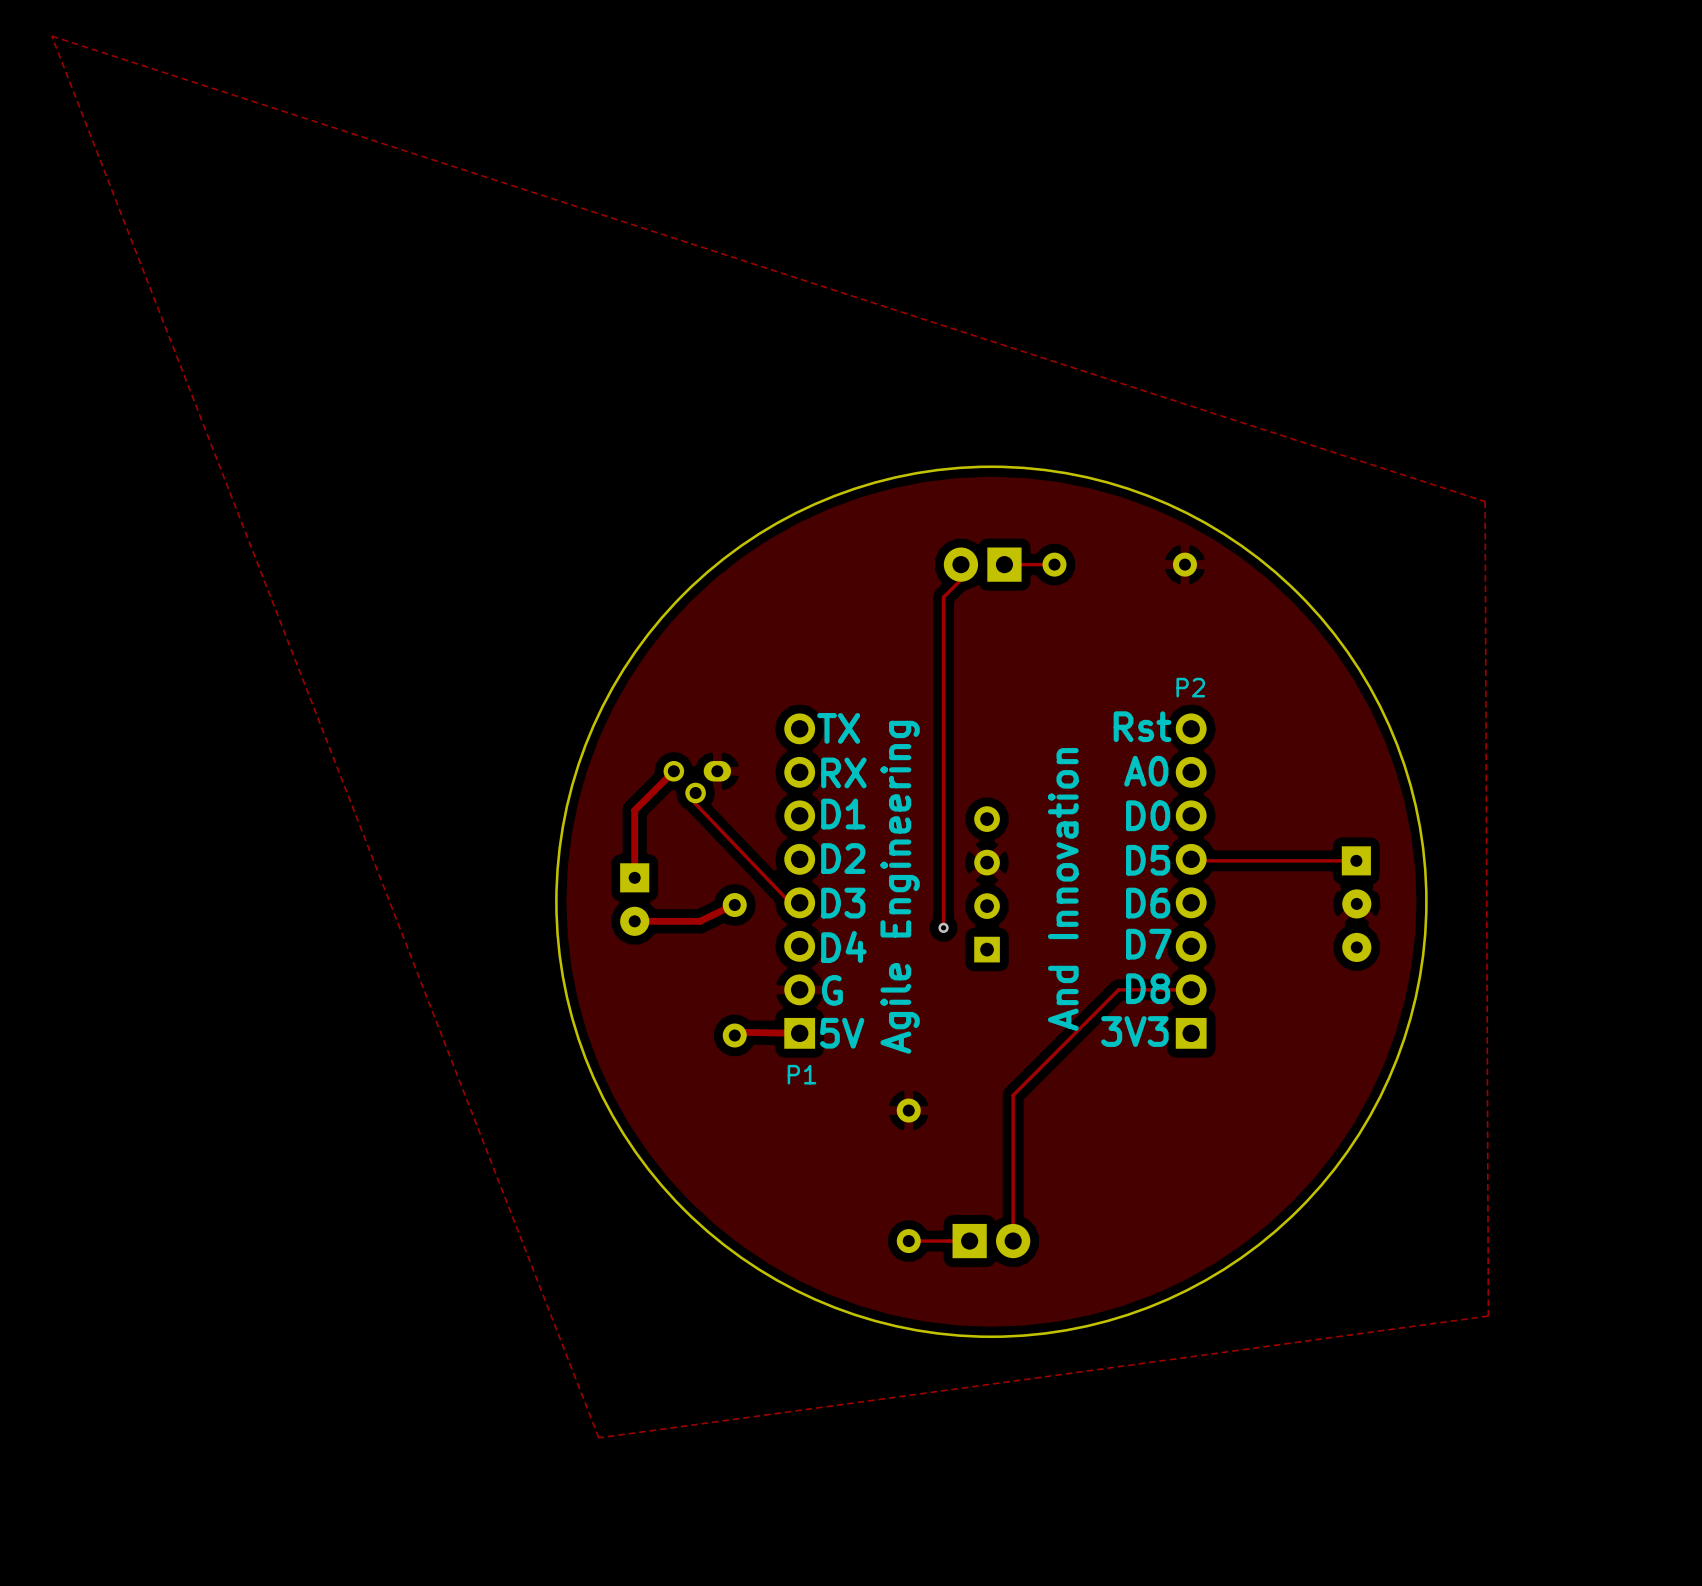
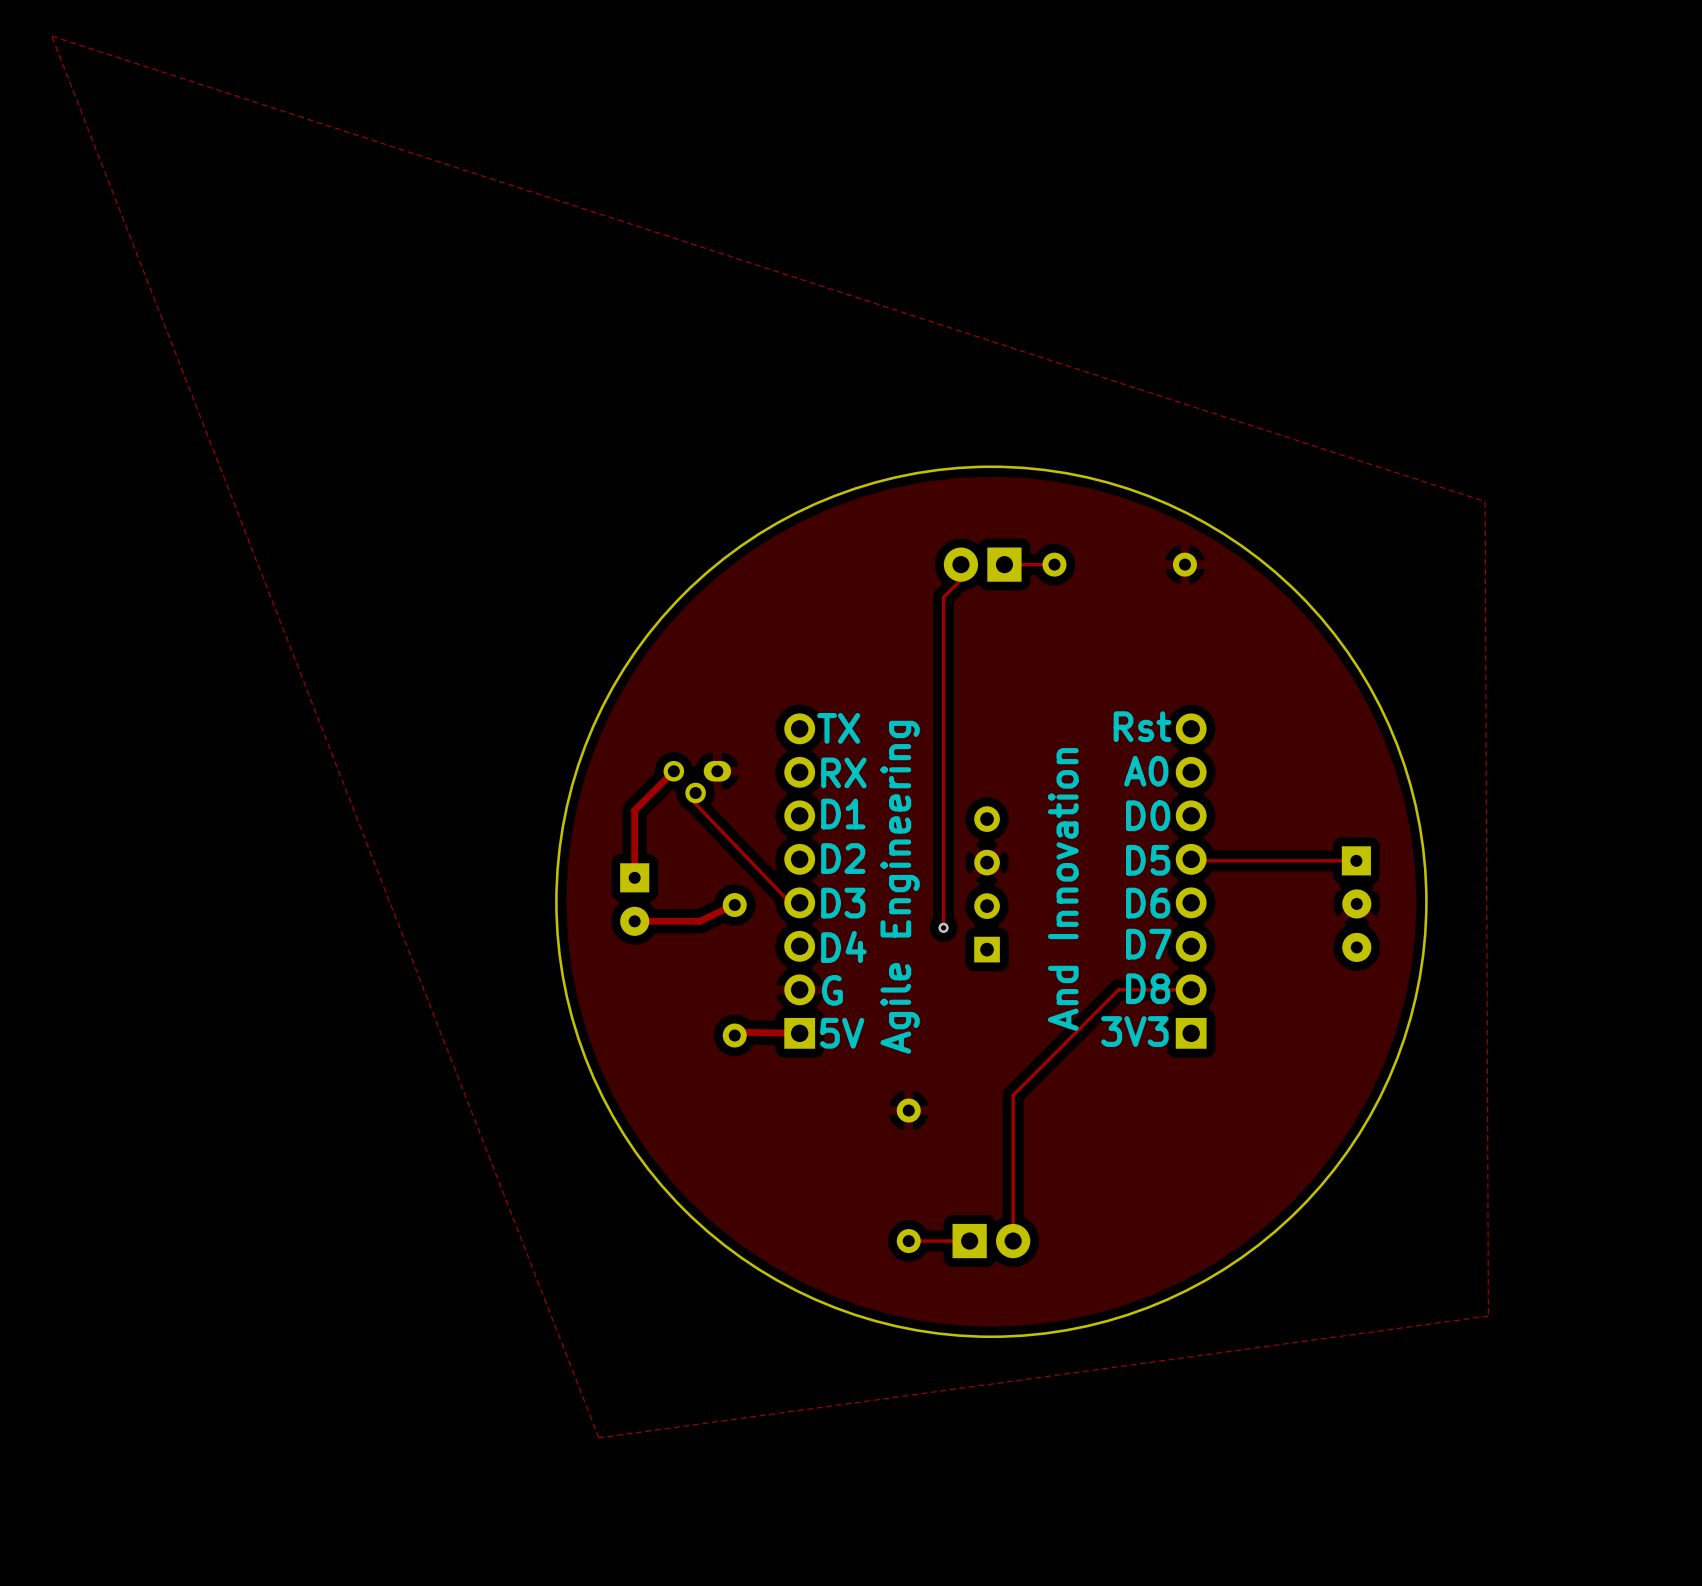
P2 name: P2 (1190, 687) -> none
P1 name: P1 (801, 1074) -> none

